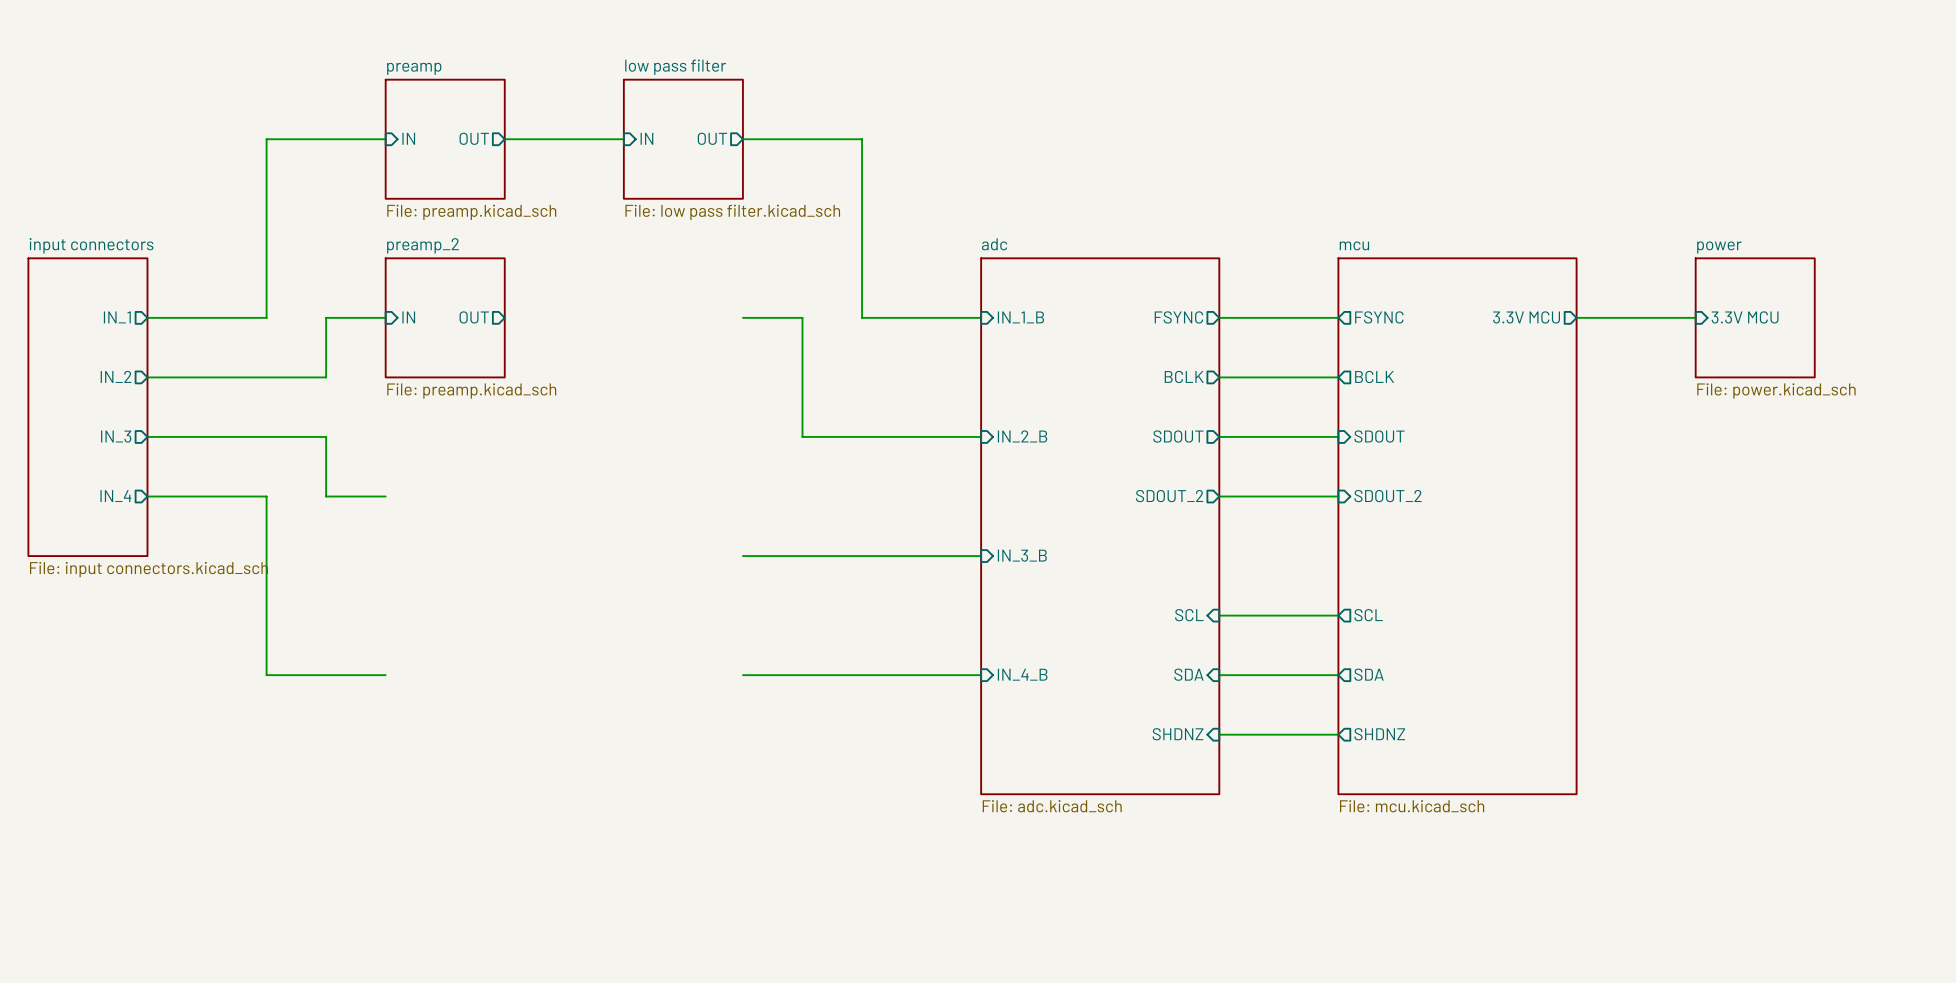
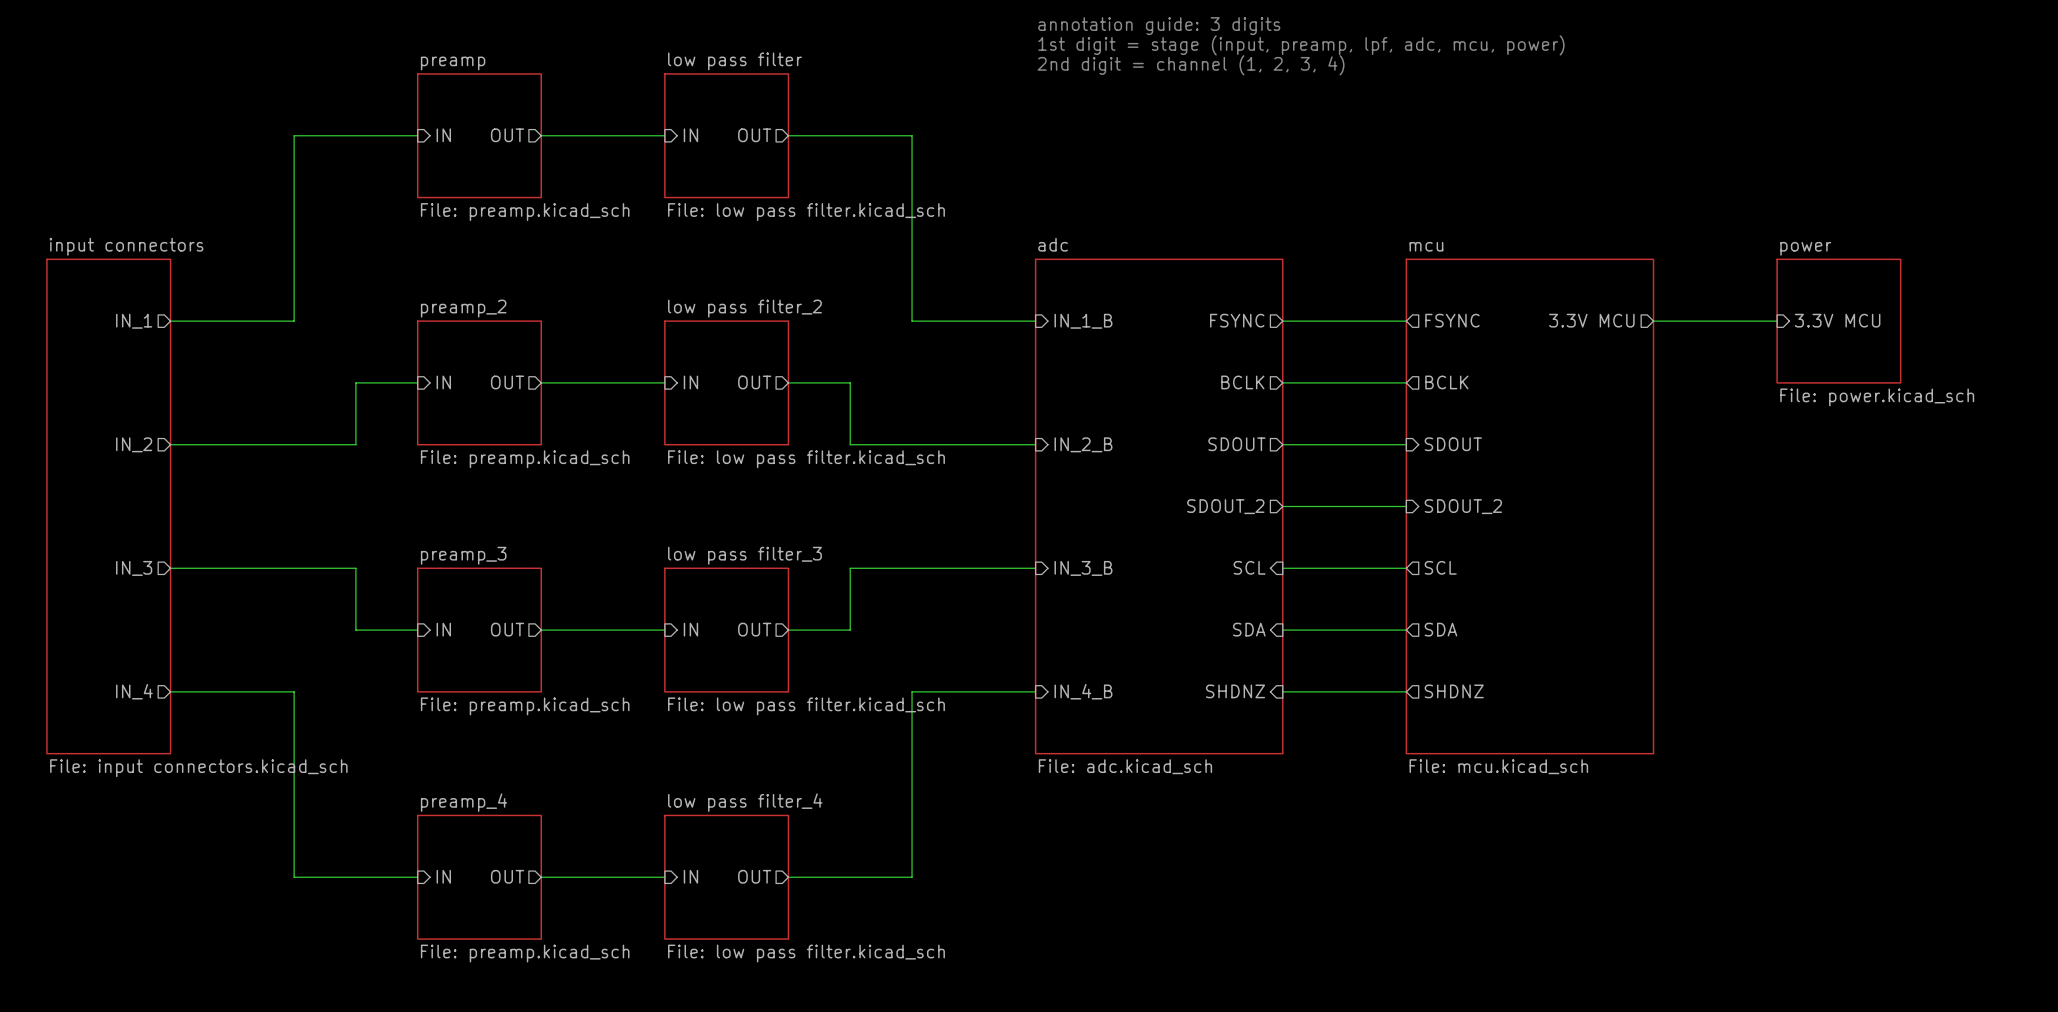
text: none -> annotation guide: 3 digits (1159, 26)
text: none -> 1st digit = stage (input, preamp, lpf, adc, mcu, power) (1301, 45)
text: none -> 2nd digit = channel (1, 2, 3, 4) (1191, 65)
wire: (385, 317) (326, 317) (326, 377) (147, 377) -> none
sheet pin position: IN (408, 317) -> IN (443, 382)
sheet preamp_2 position: (445, 317) -> (479, 382)
sheet pin position: OUT (474, 317) -> OUT (507, 382)
wire: (742, 317) (802, 317) (802, 377) -> (788, 382) (850, 382)
sheet pin: IN_2 (116, 376) -> none
sheet pin: none -> IN (690, 382)
sheet pin: none -> OUT (754, 382)
wire: none -> (541, 382) (664, 382)
sheet low pass filter_2: none -> File: low pass filter.kicad_sch (726, 382)
sheet input connectors: File: input connectors.kicad_sch (87, 407) -> none
sheet pin: IN_3 (116, 436) -> IN_2 (134, 444)
wire: (326, 436) (326, 496) (385, 496) -> (355, 444) (355, 382) (417, 382)
sheet input connectors: none -> File: input connectors.kicad_sch (108, 506)
sheet pin position: IN_4 (115, 496) -> IN_4 (134, 691)
wire: (147, 496) (266, 496) (266, 675) (385, 675) -> (170, 691) (294, 691) (294, 877) (417, 877)
sheet adc: none -> File: adc.kicad_sch (1159, 506)
sheet mcu: none -> File: mcu.kicad_sch (1529, 506)
sheet adc: File: adc.kicad_sch (1100, 526) -> none
sheet mcu: File: mcu.kicad_sch (1457, 526) -> none
sheet pin: none -> IN_3 (134, 568)
sheet pin: none -> SCL (1249, 567)
sheet pin: none -> SCL (1440, 567)
wire: none -> (170, 568) (355, 568) (355, 630) (417, 630)
wire: (742, 556) (802, 556) -> (788, 630) (850, 630) (850, 568)
sheet pin: none -> IN (443, 629)
sheet preamp_3: none -> File: preamp.kicad_sch (479, 630)
sheet pin: none -> OUT (507, 629)
wire: none -> (541, 630) (664, 630)
sheet pin: none -> IN (690, 629)
sheet low pass filter_3: none -> File: low pass filter.kicad_sch (726, 630)
sheet pin: none -> OUT (754, 629)
sheet pin: SCL (1189, 615) -> SDA (1249, 629)
sheet pin: SCL (1368, 615) -> SDA (1440, 629)
sheet pin: SDA (1188, 674) -> SHDNZ (1235, 691)
sheet pin: SDA (1369, 674) -> SHDNZ (1454, 691)
wire: (742, 675) (862, 675) -> (788, 877) (912, 877) (912, 691)
sheet pin: SHDNZ (1177, 734) -> none
wire: (1219, 734) (1338, 734) -> (1282, 568) (1406, 568)
sheet pin: SHDNZ (1379, 734) -> none
sheet pin: none -> IN (443, 876)
sheet preamp_4: none -> File: preamp.kicad_sch (479, 877)
sheet pin: none -> OUT (507, 876)
wire: none -> (541, 877) (664, 877)
sheet pin: none -> IN (690, 876)
sheet low pass filter_4: none -> File: low pass filter.kicad_sch (726, 877)
sheet pin: none -> OUT (754, 876)

